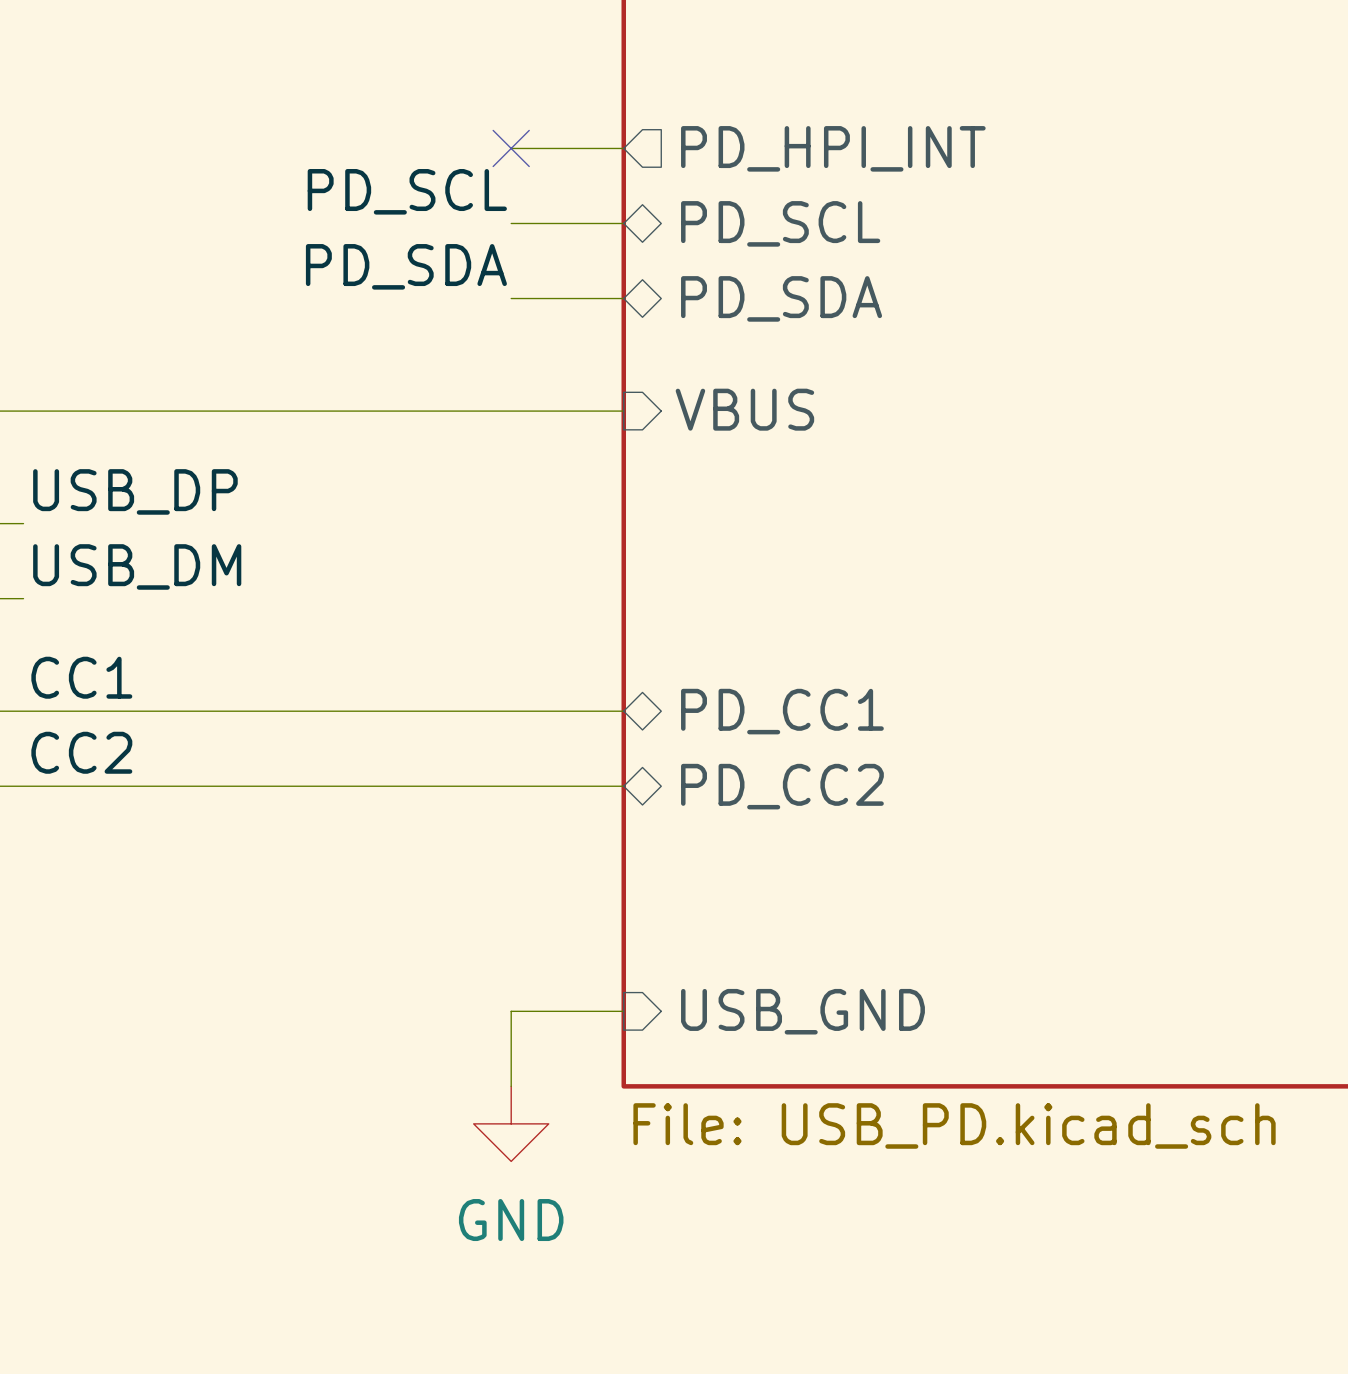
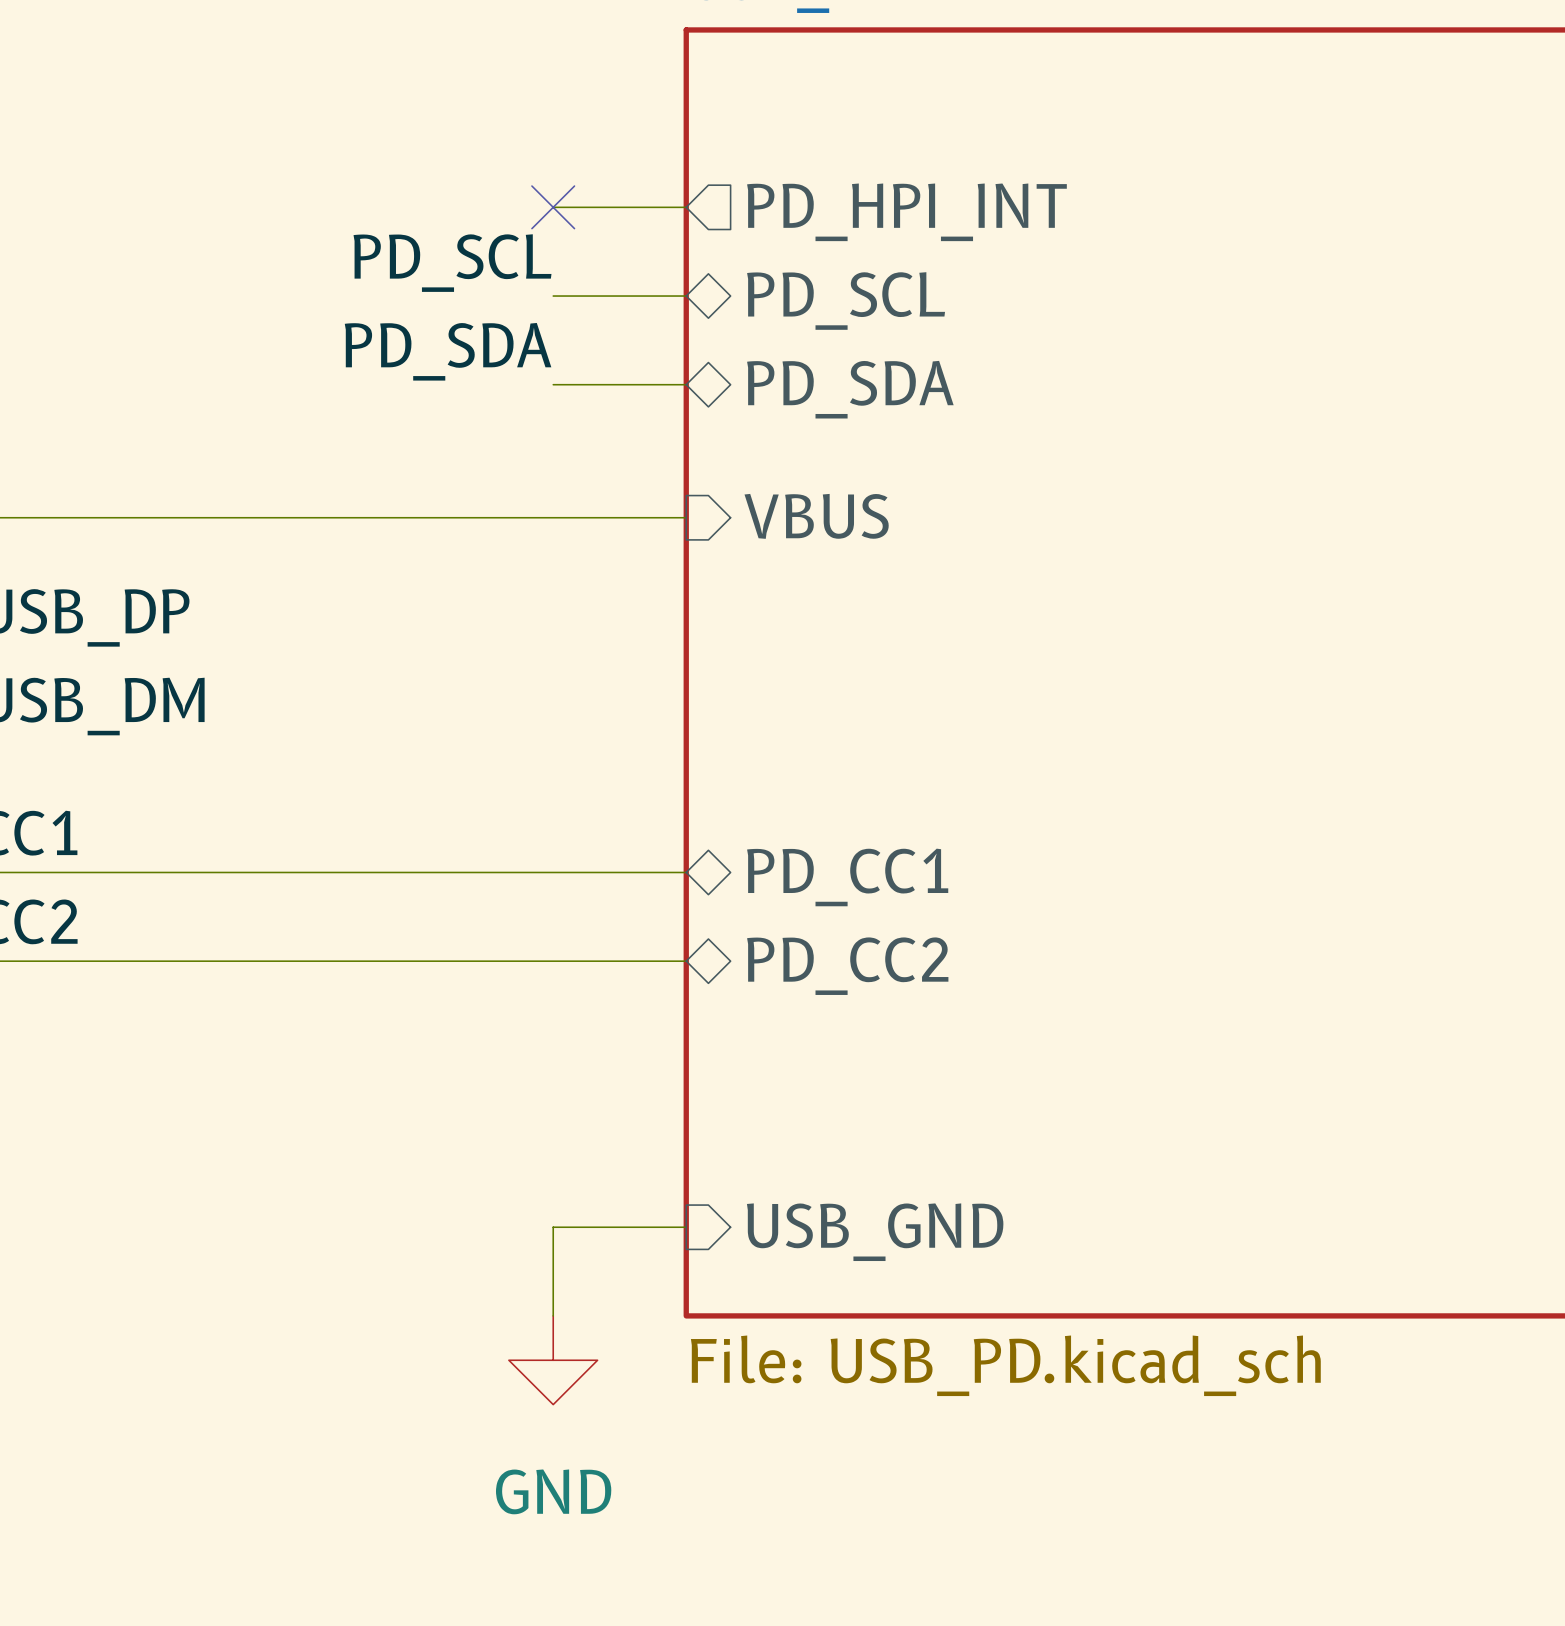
power symbol text position: GND (511, 1220) -> GND (553, 1491)

